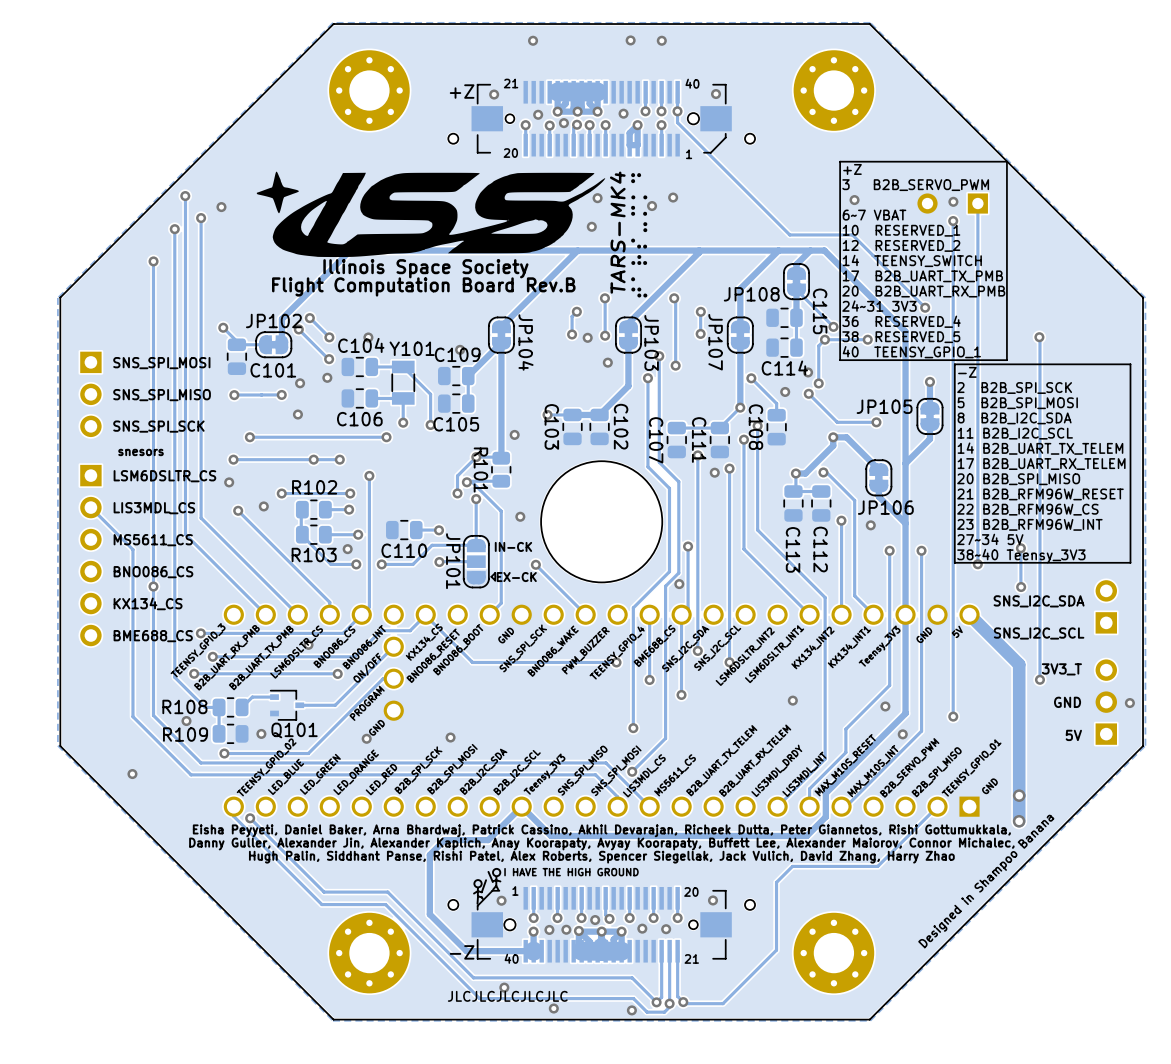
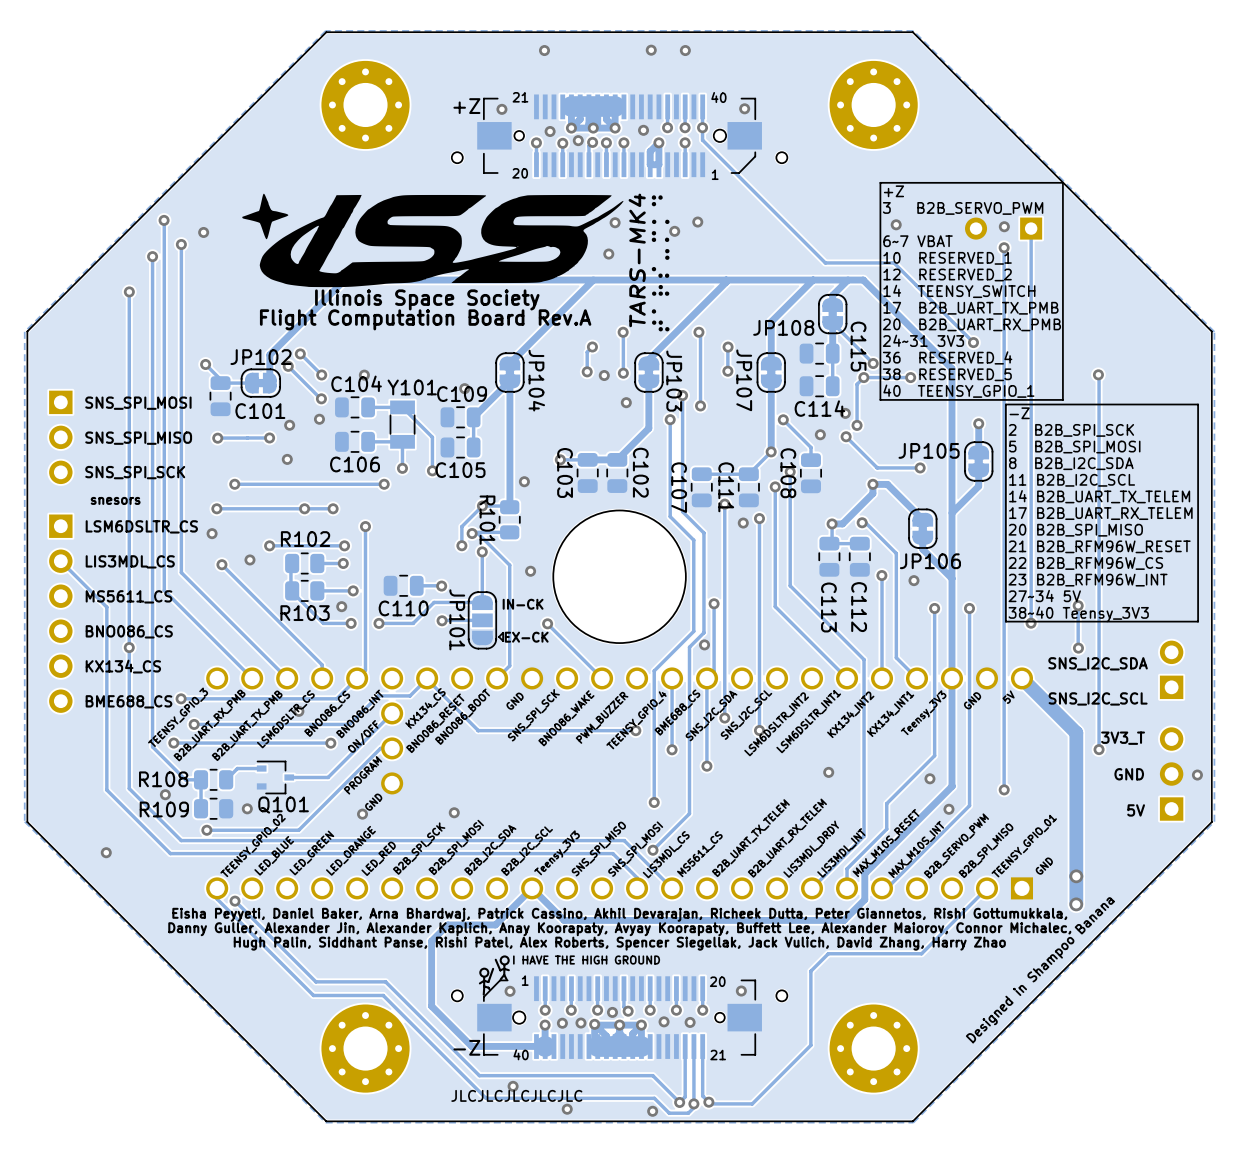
text: Flight Computation Board Rev.B (423, 286) -> Flight Computation Board Rev.A (425, 319)

